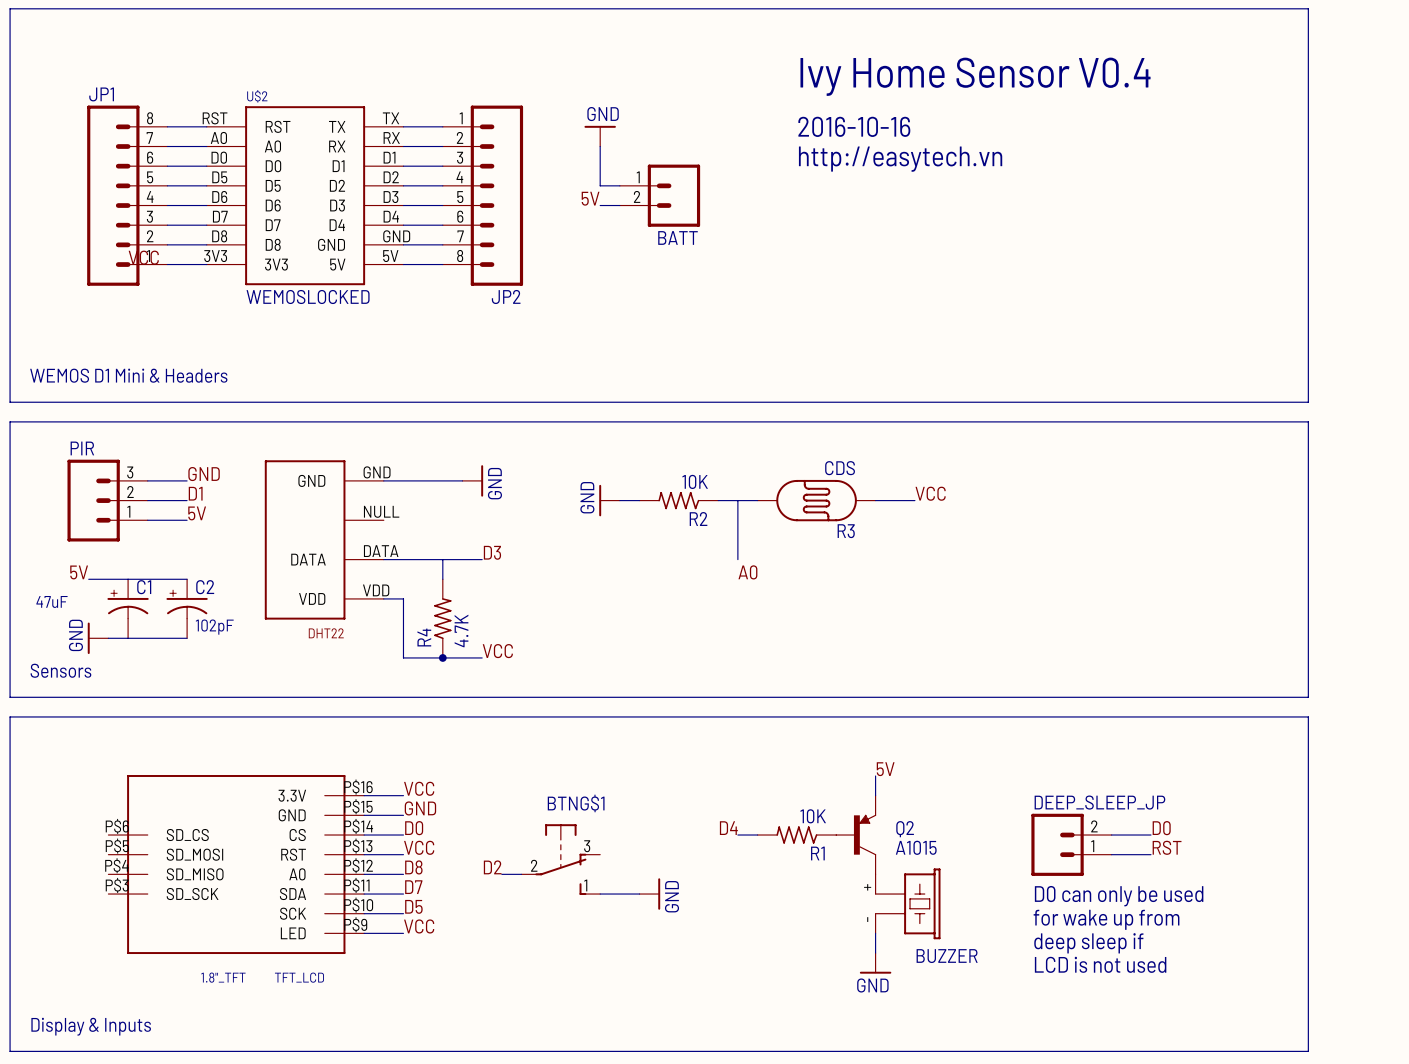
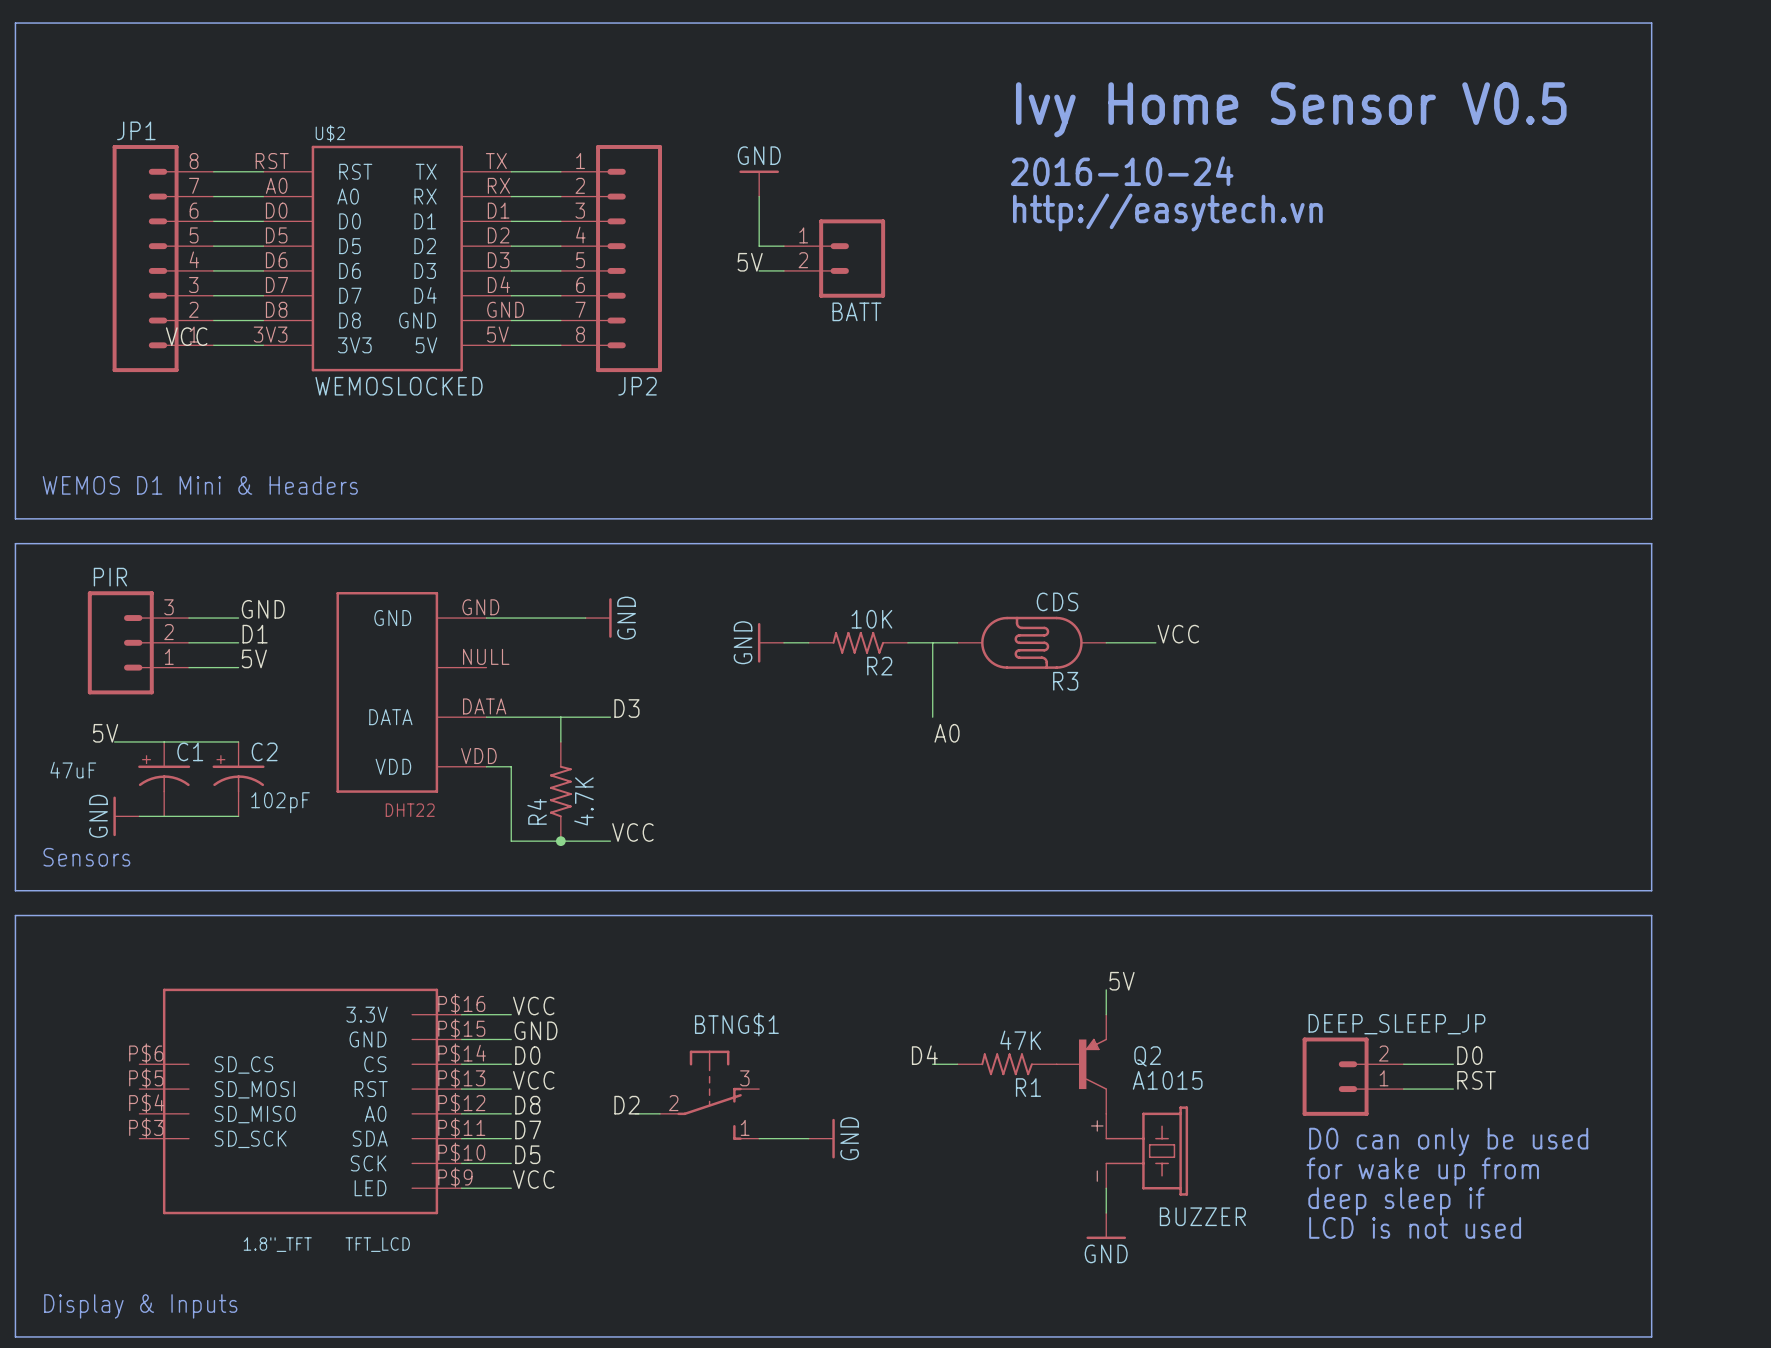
text: Ivy Home Sensor V0.4 (975, 76) -> Ivy Home Sensor V0.5 (1291, 109)
text: 2016-10-16 (854, 126) -> 2016-10-24 (1122, 171)
R1 value: 10K (813, 816) -> 47K (1020, 1040)

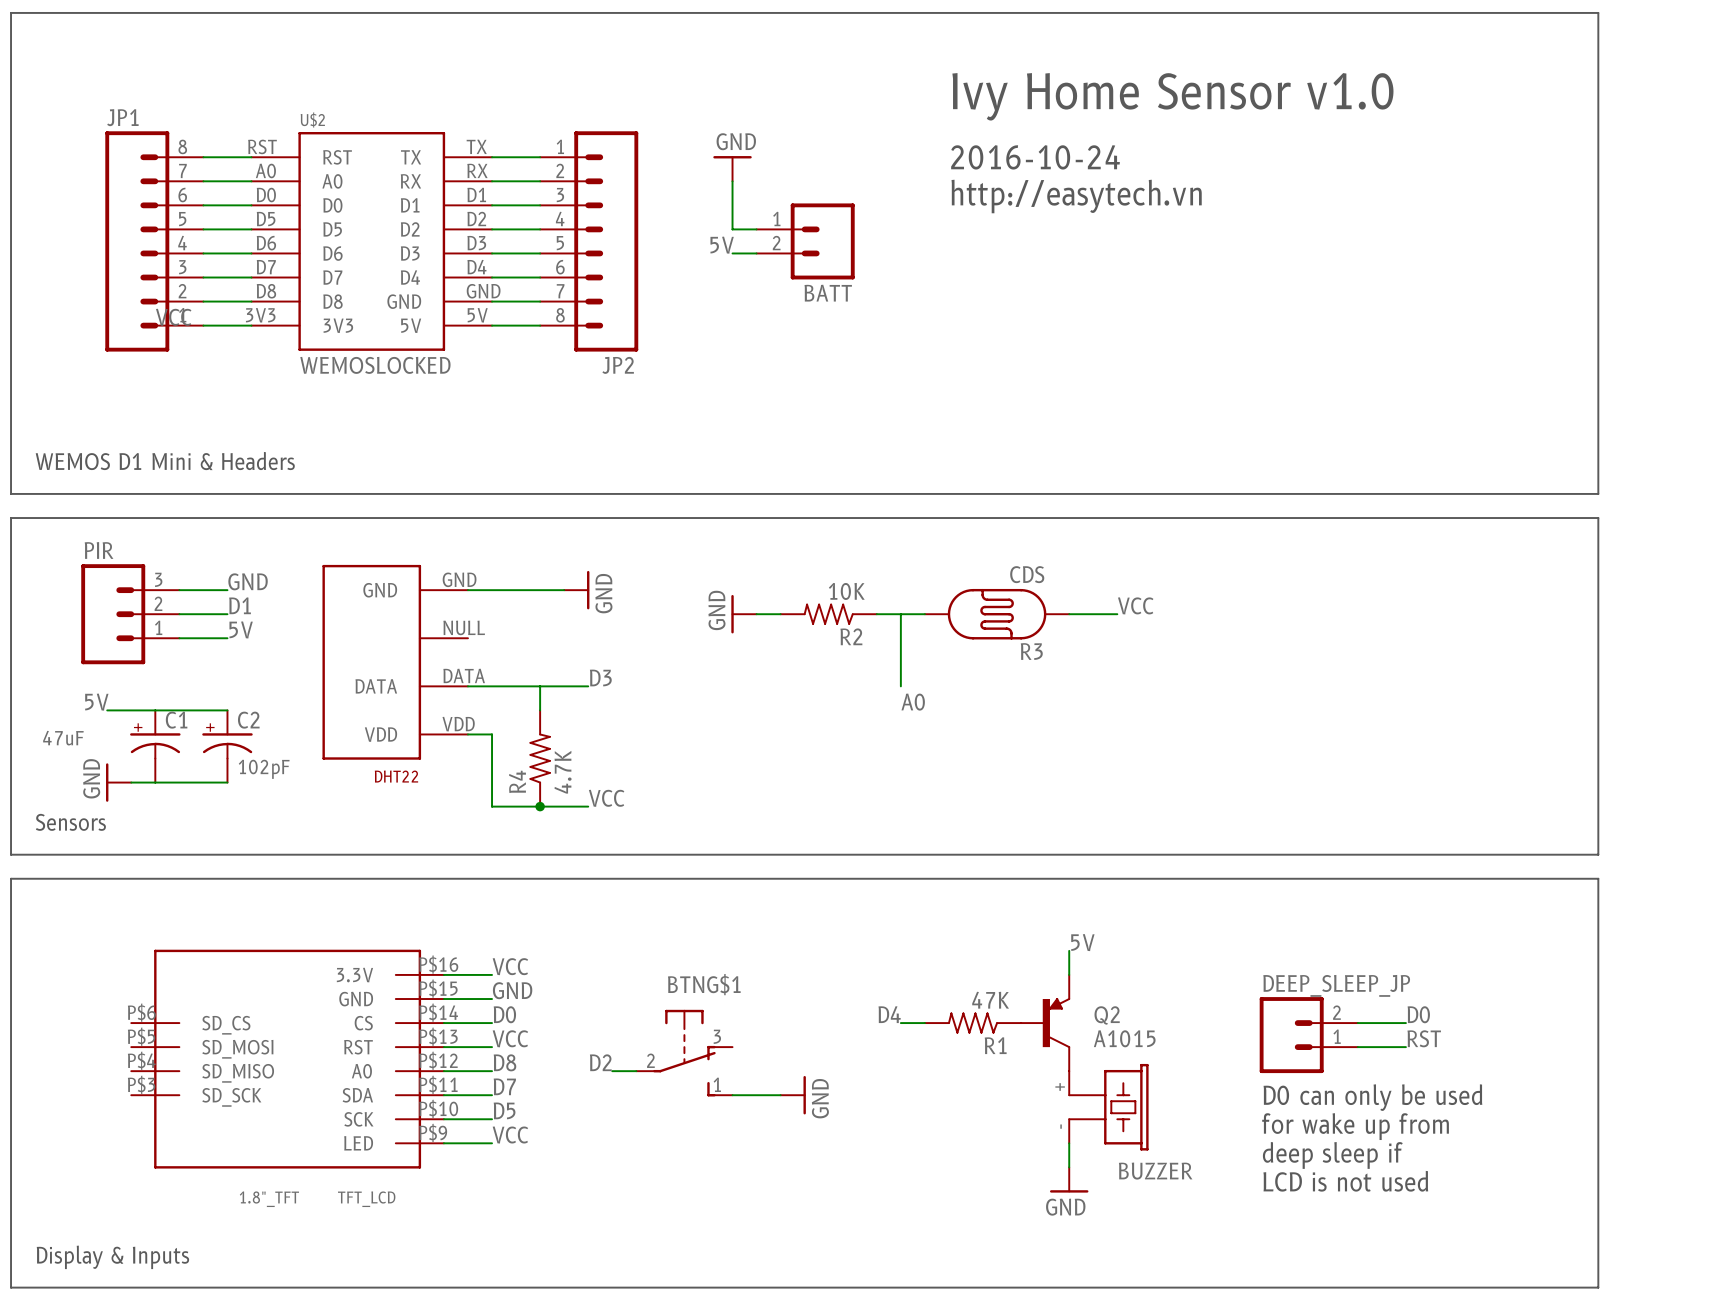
text: Ivy Home Sensor V0.5 (1291, 109) -> Ivy Home Sensor v1.0 (1172, 96)
text position: 2016-10-24 (1122, 171) -> 2016-10-24 (1035, 157)
text position: http://easytech.vn (1167, 212) -> http://easytech.vn (1076, 196)

